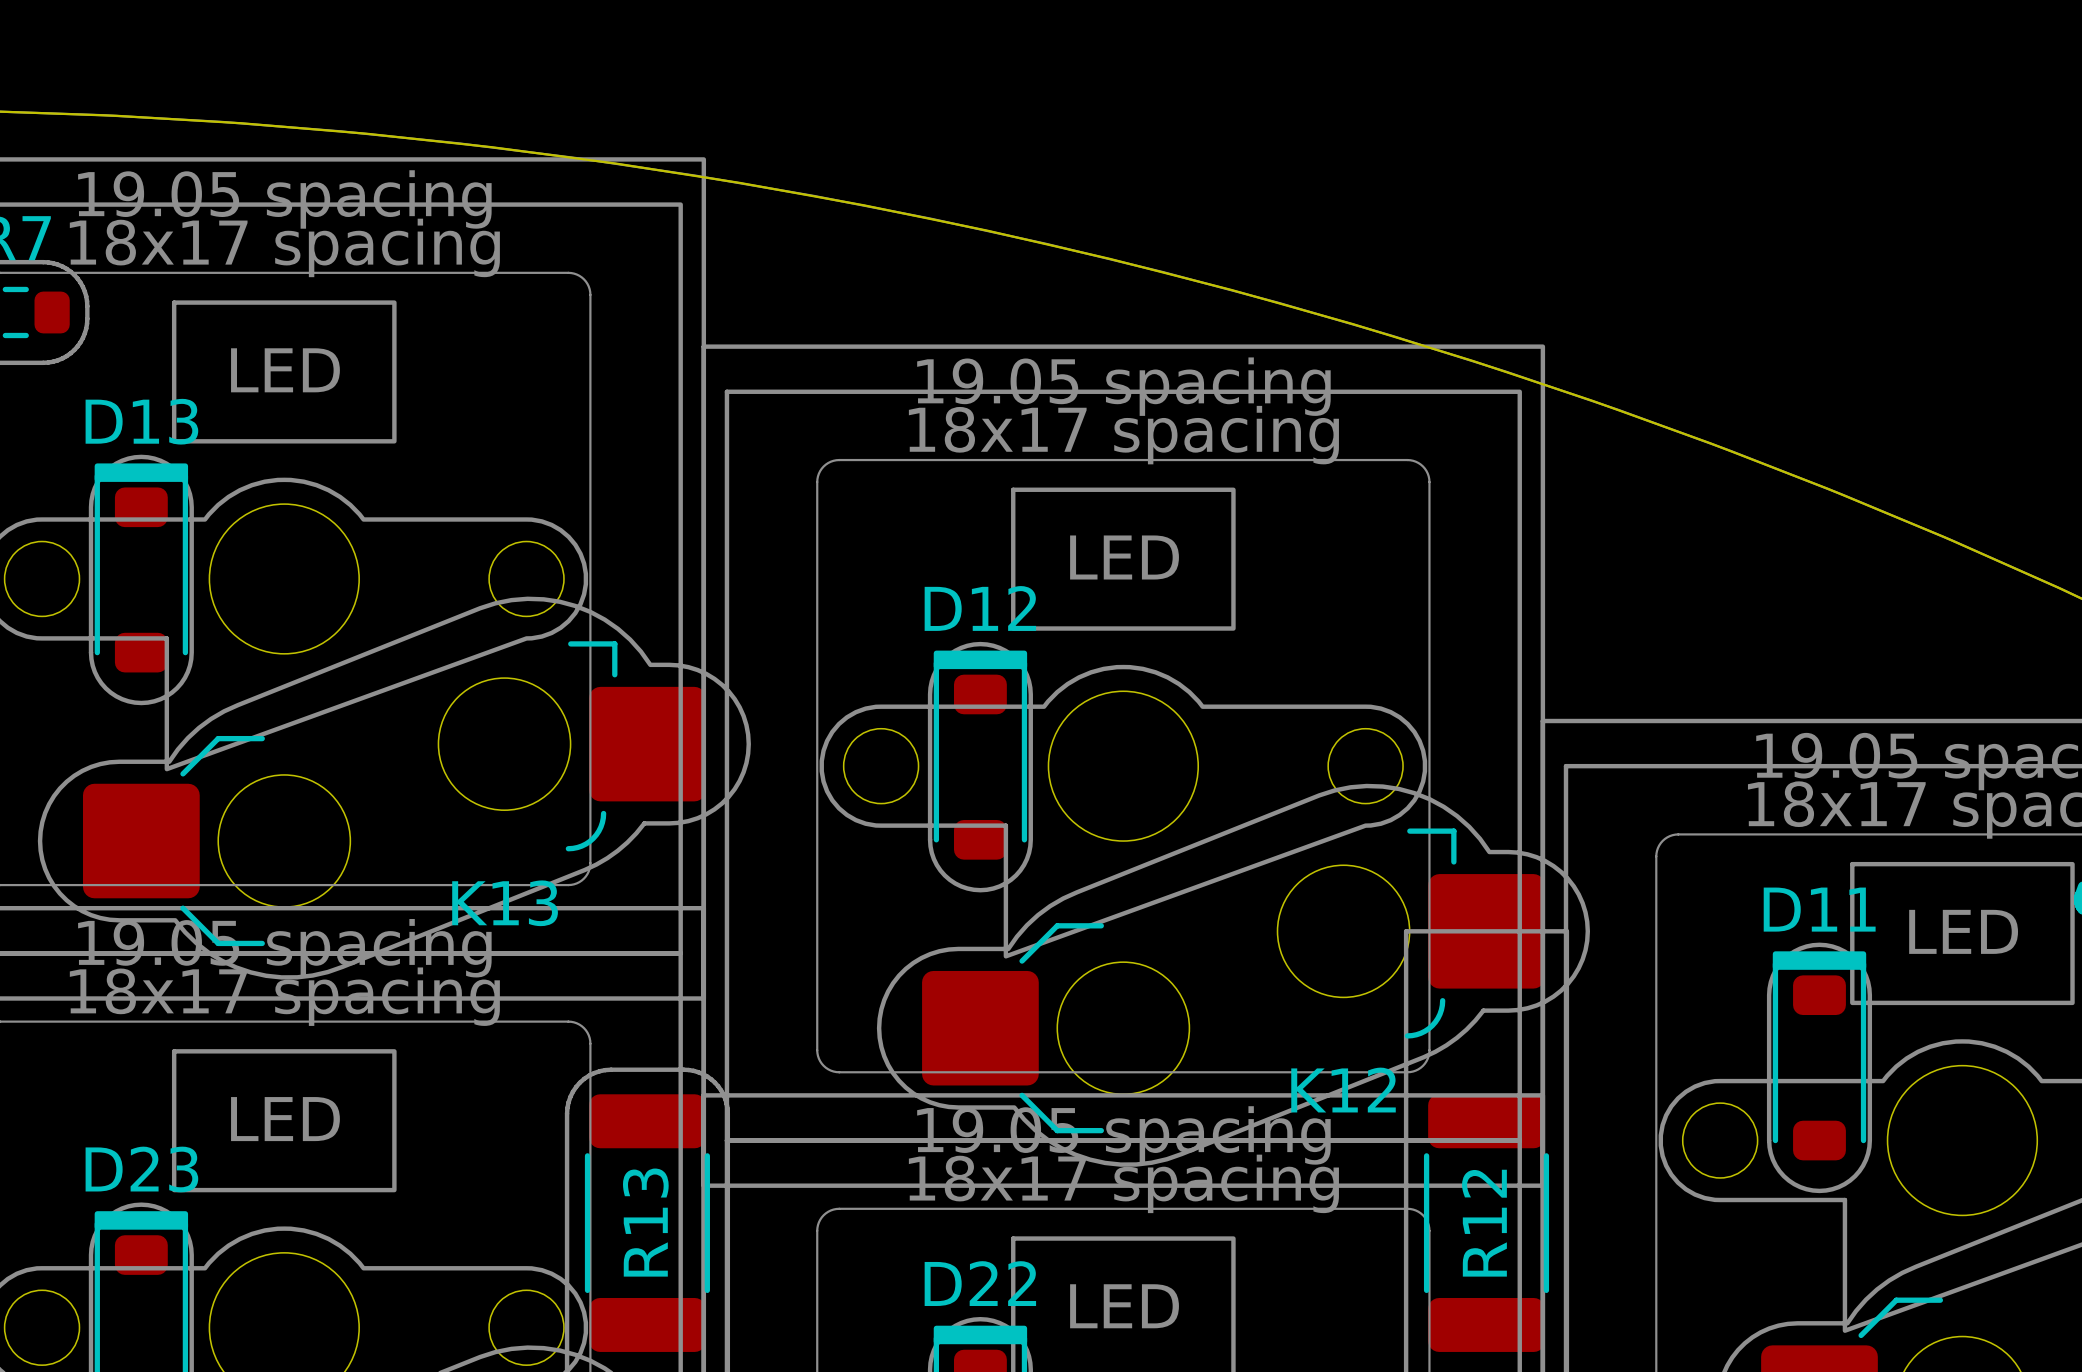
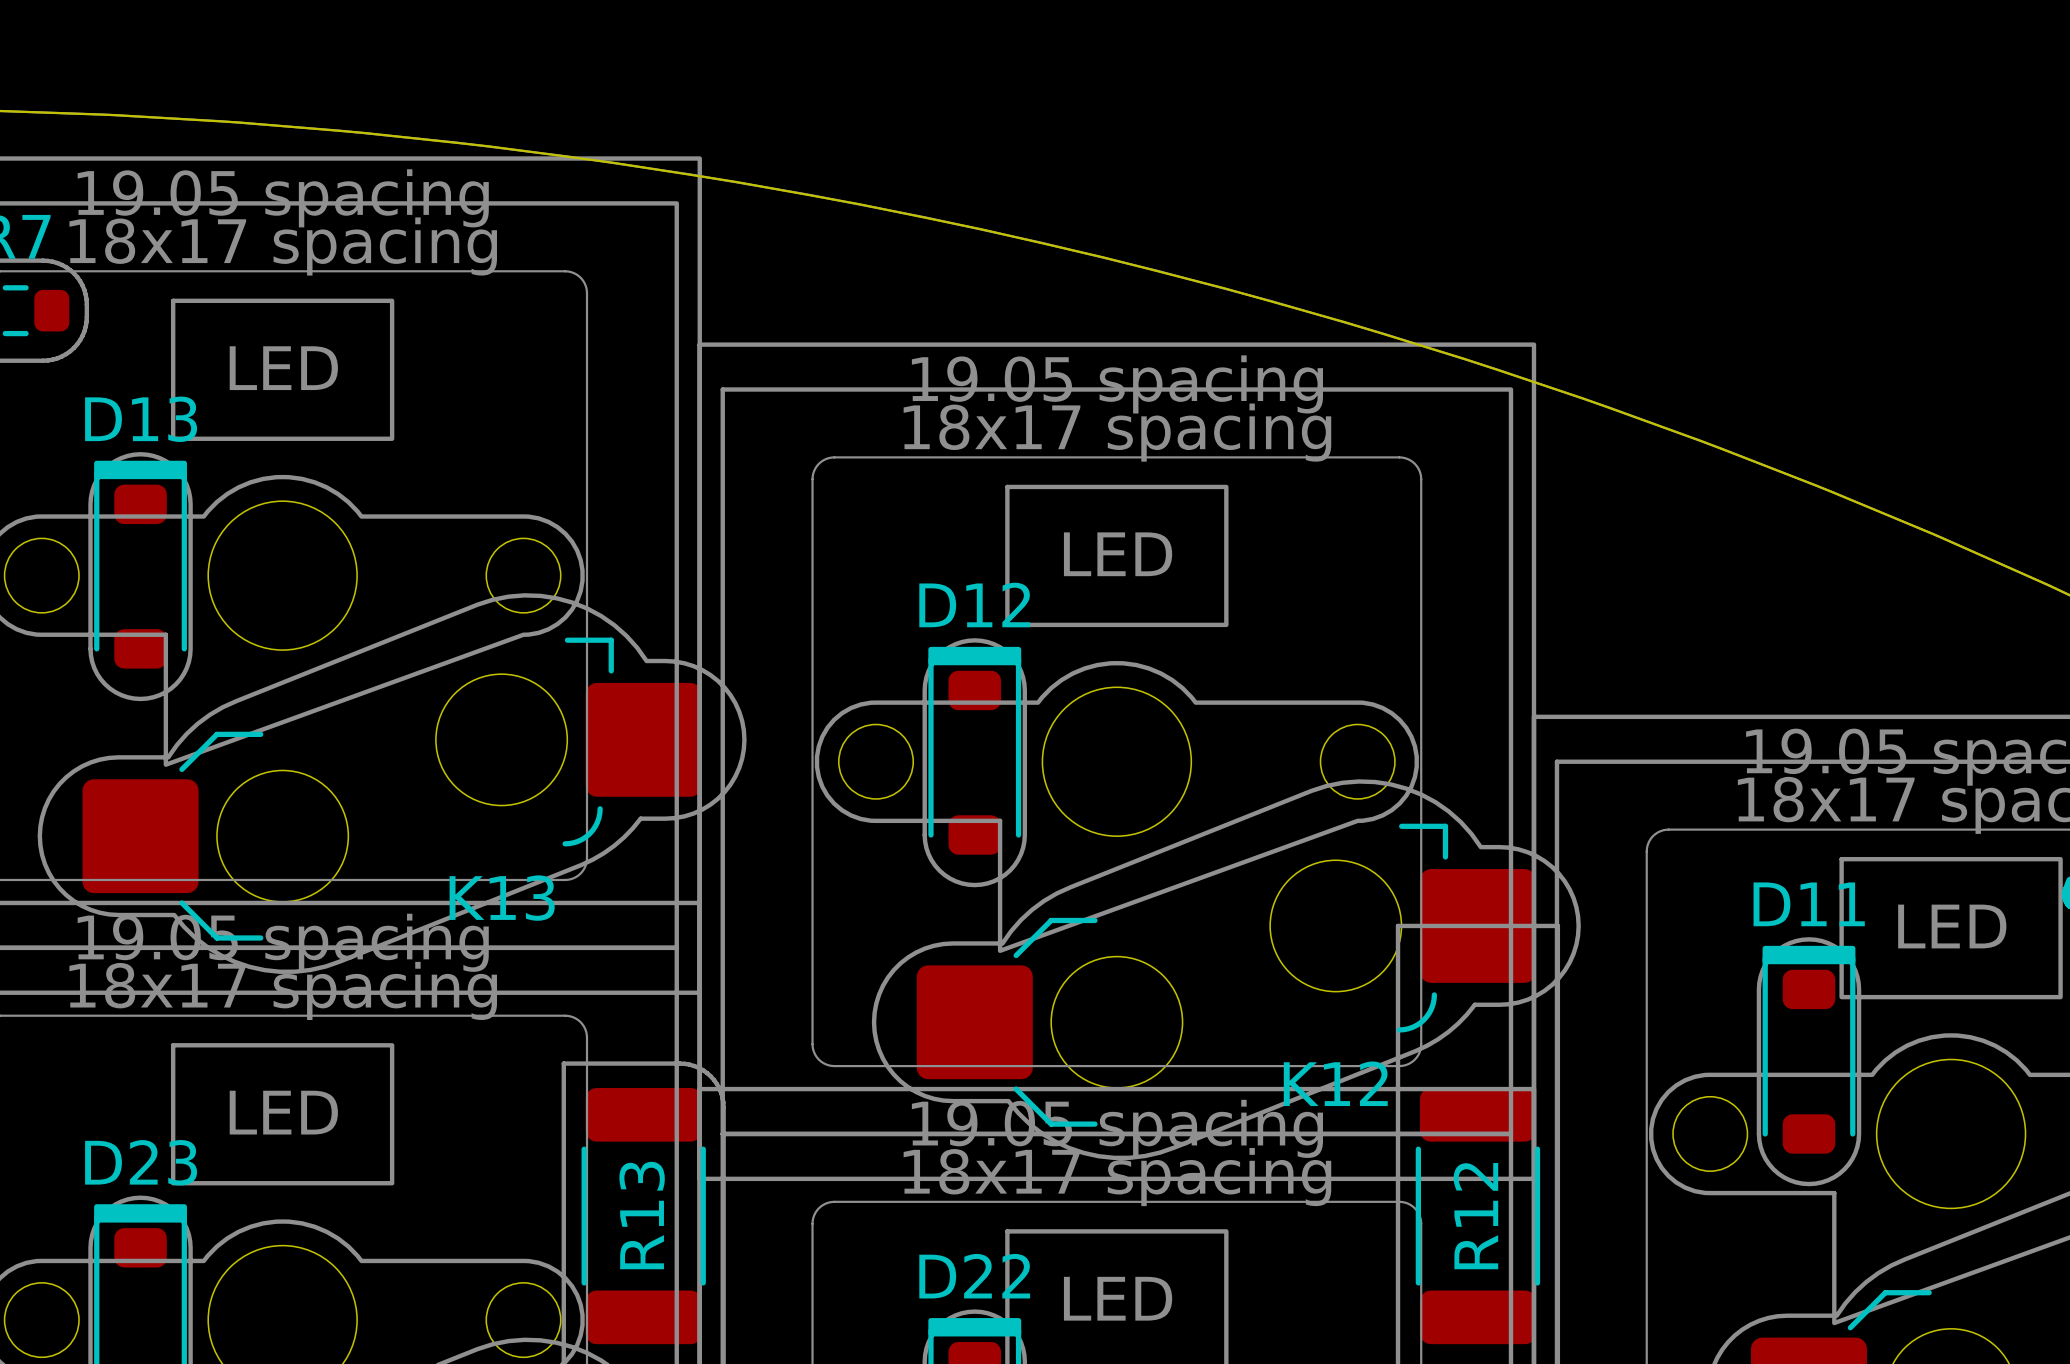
line: (611, 1069) (594, 1073) (579, 1082) (570, 1096) (567, 1113) -> (607, 1063) (563, 1063) (563, 1107)

